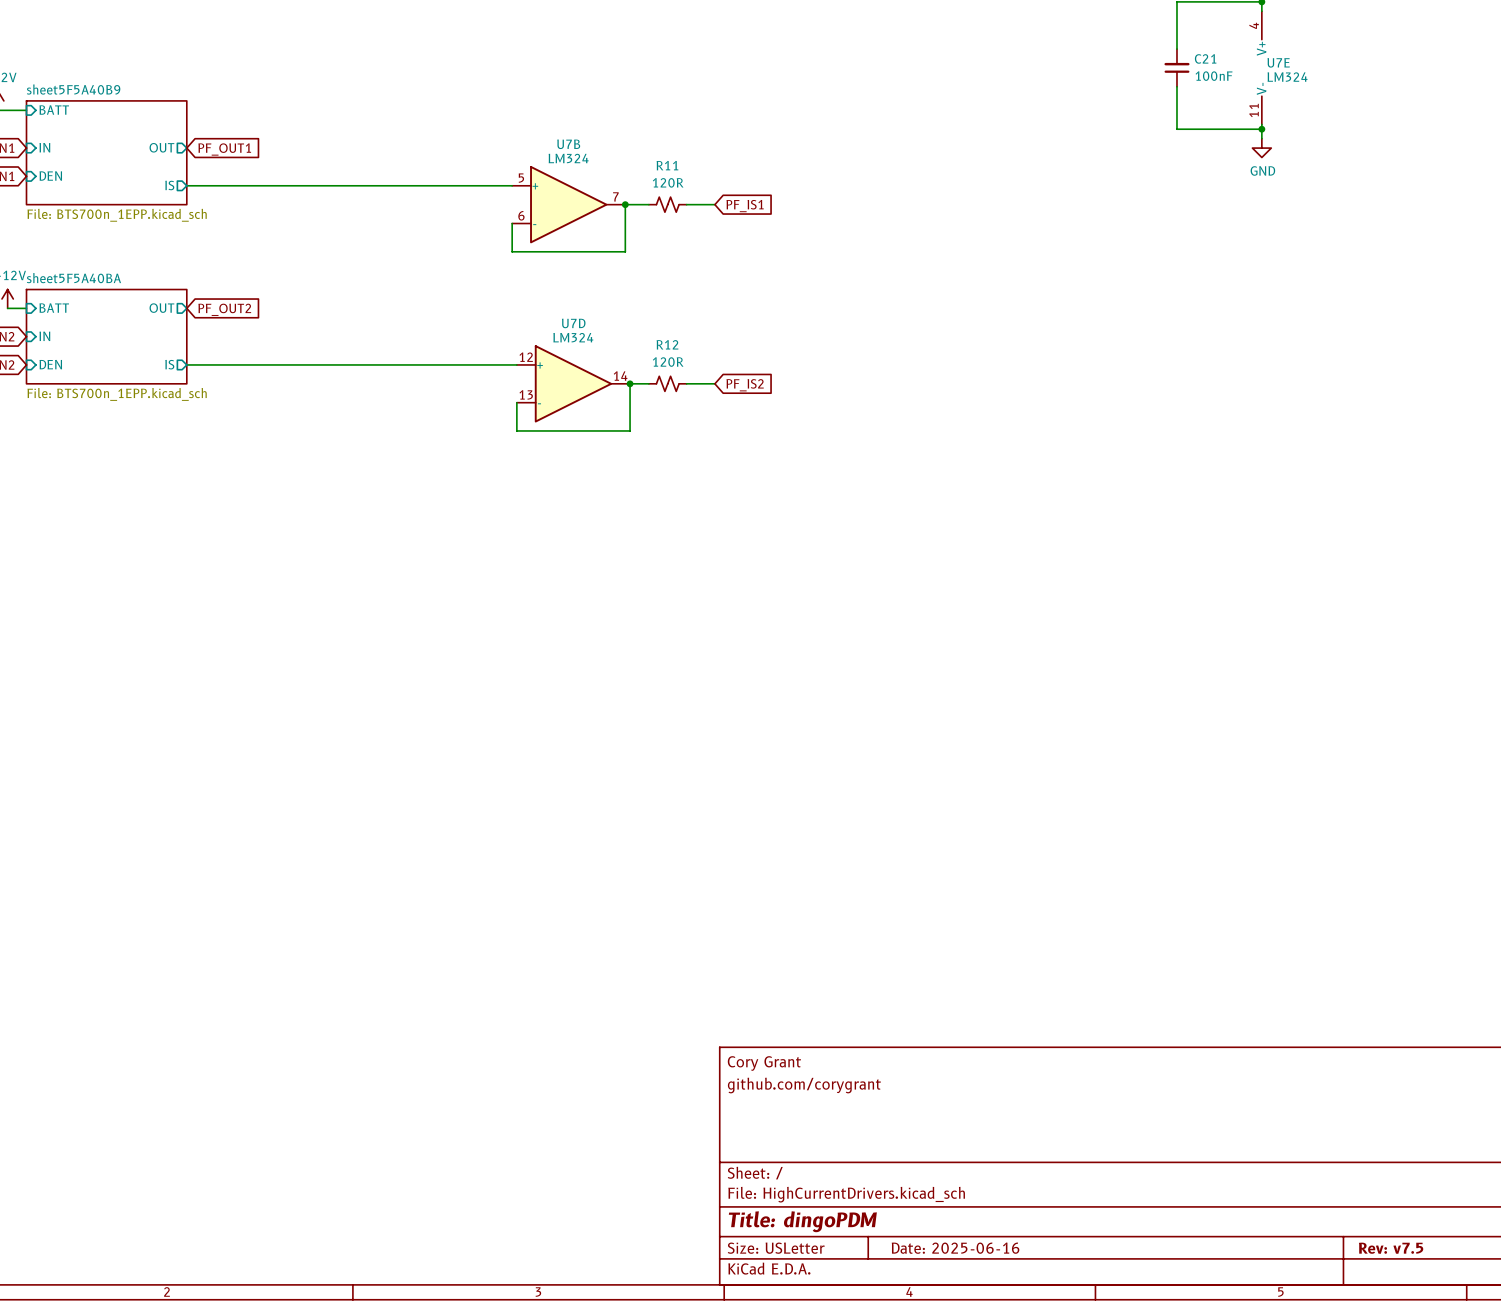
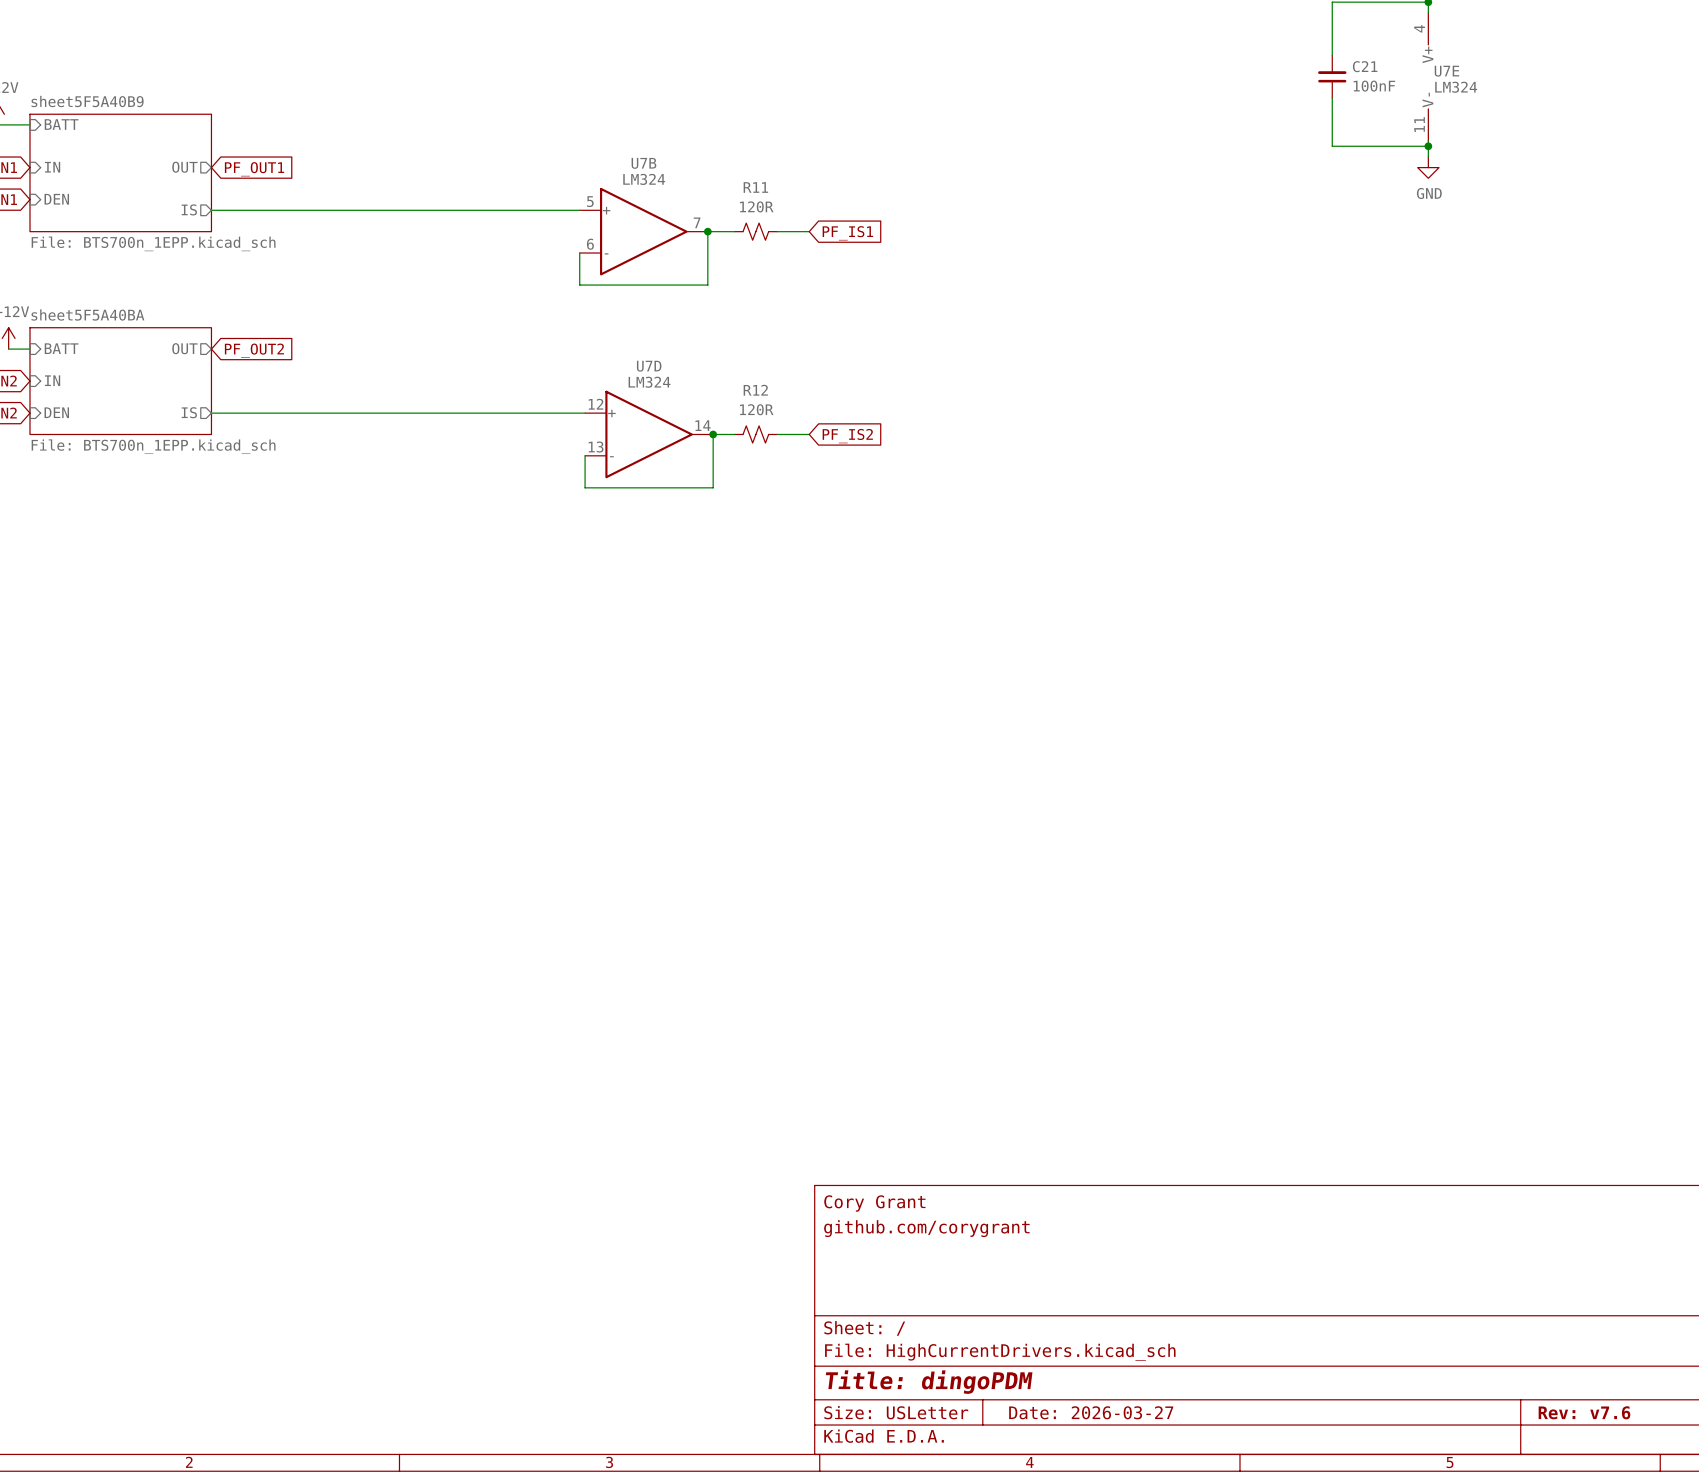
title block: Date: 2025-06-16 (955, 1248) -> Date: 2026-03-27 (1091, 1412)
title block: Rev: v7.5 (1391, 1248) -> Rev: v7.6 (1584, 1412)

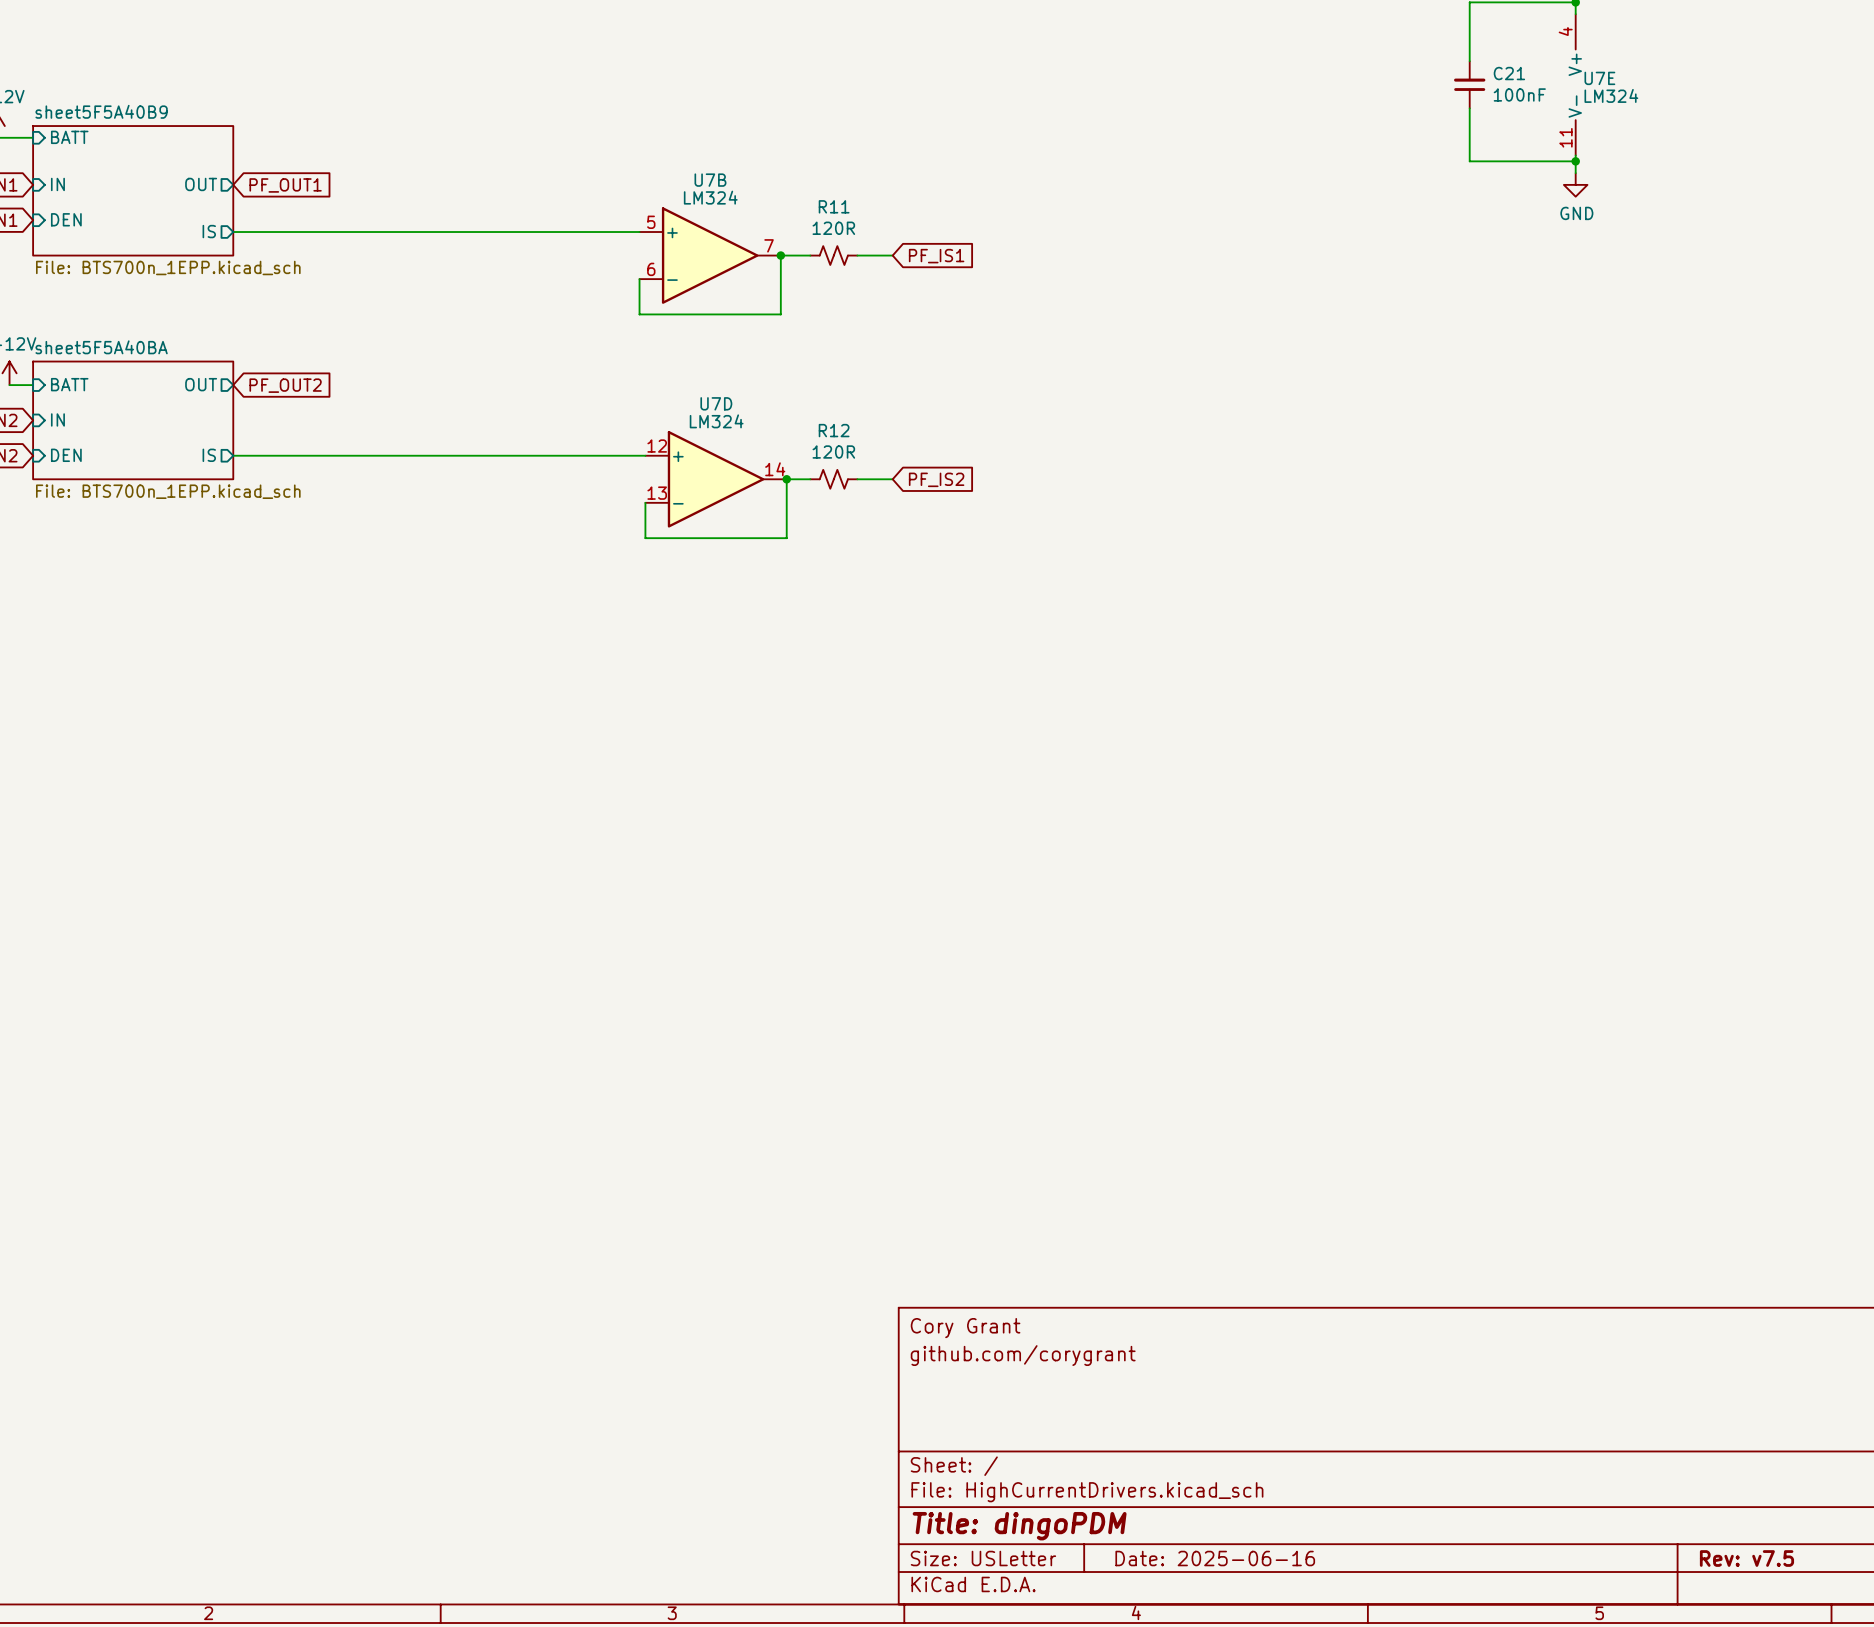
title block: Date: 2026-03-27 (1091, 1412) -> Date: 2025-06-16 (1215, 1558)
title block: Rev: v7.6 (1584, 1412) -> Rev: v7.5 (1746, 1558)

